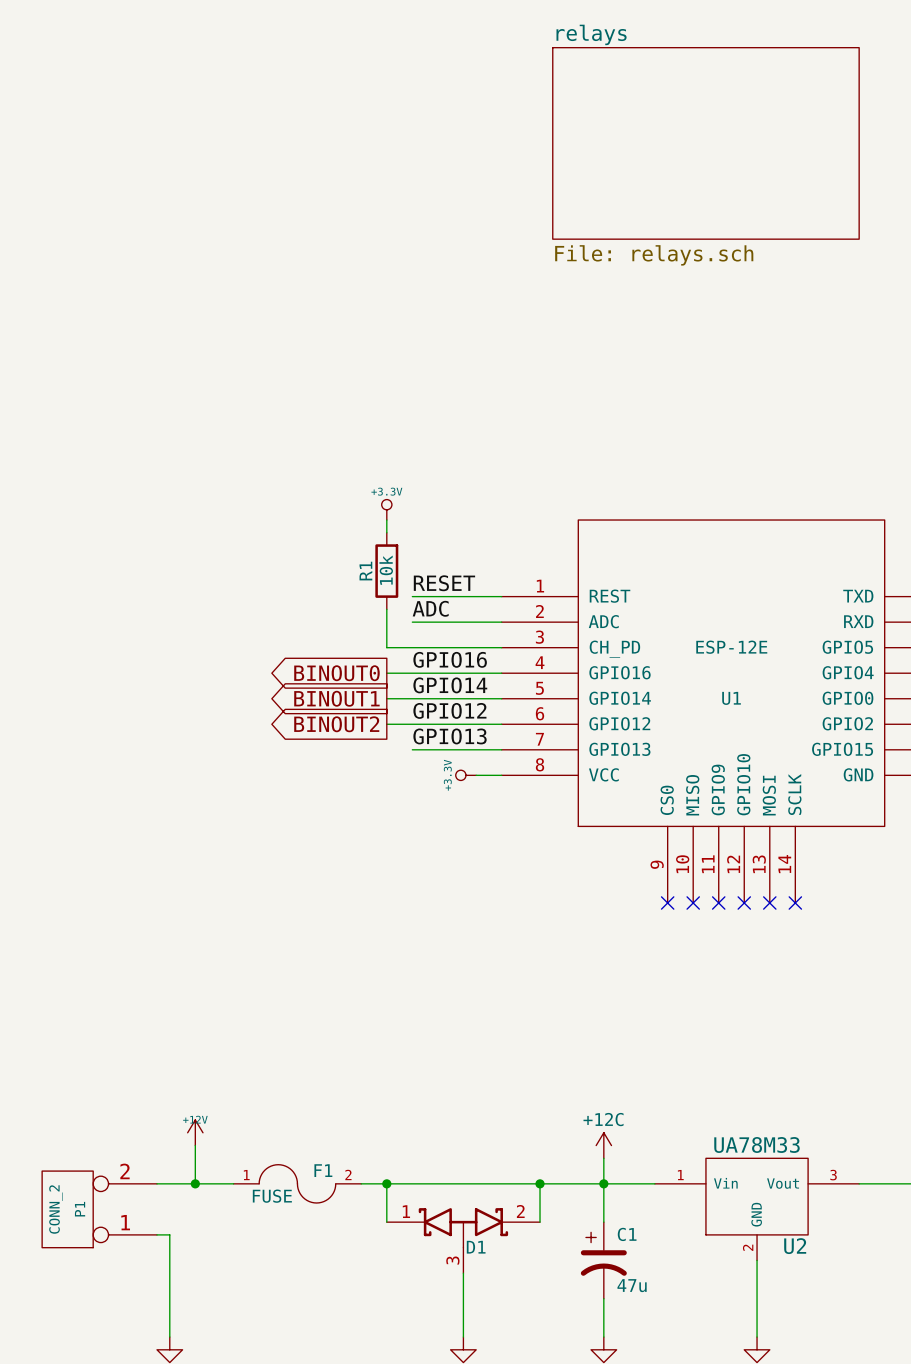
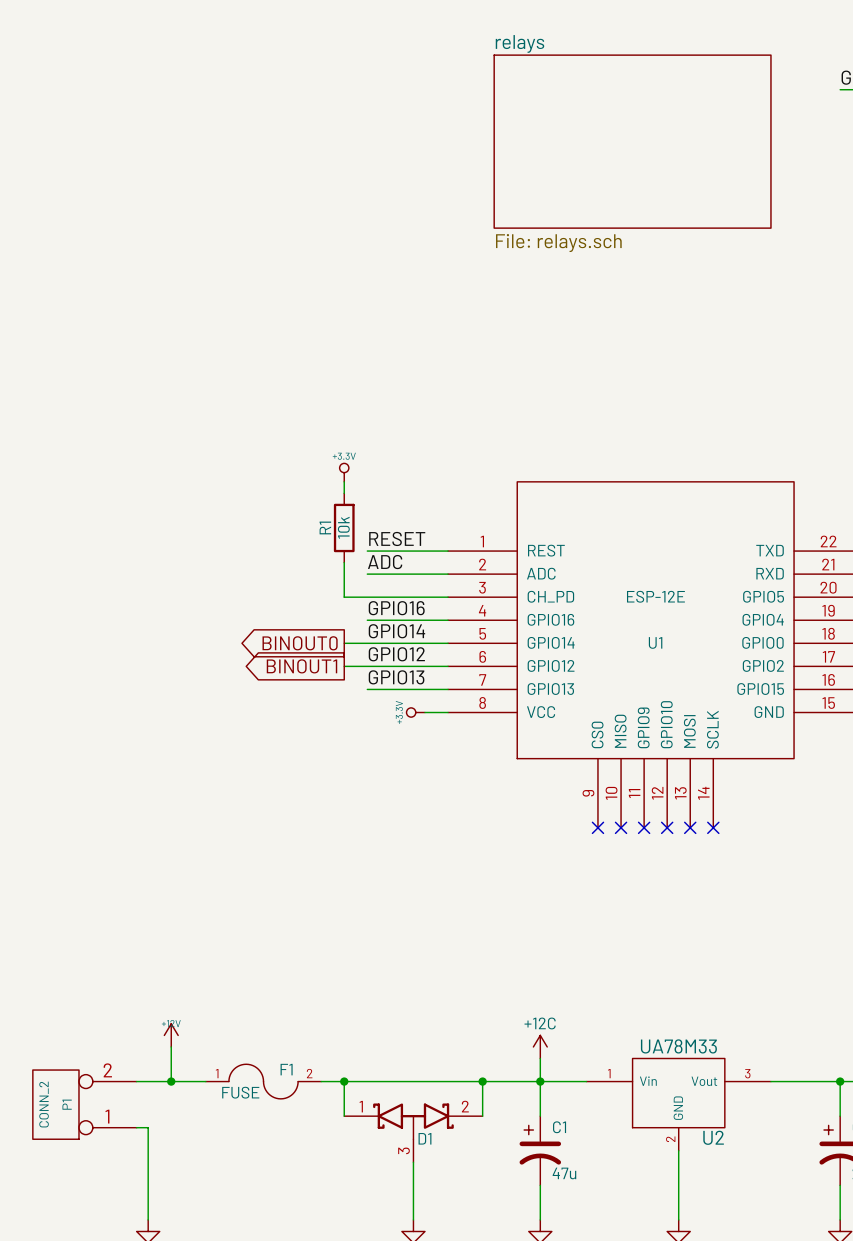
global label: BINOUT0 (336, 673) -> none
wire: (386, 673) (412, 673) -> none
global label: BINOUT1 (336, 698) -> BINOUT0 (300, 643)
global label: BINOUT2 (336, 724) -> BINOUT1 (301, 666)

